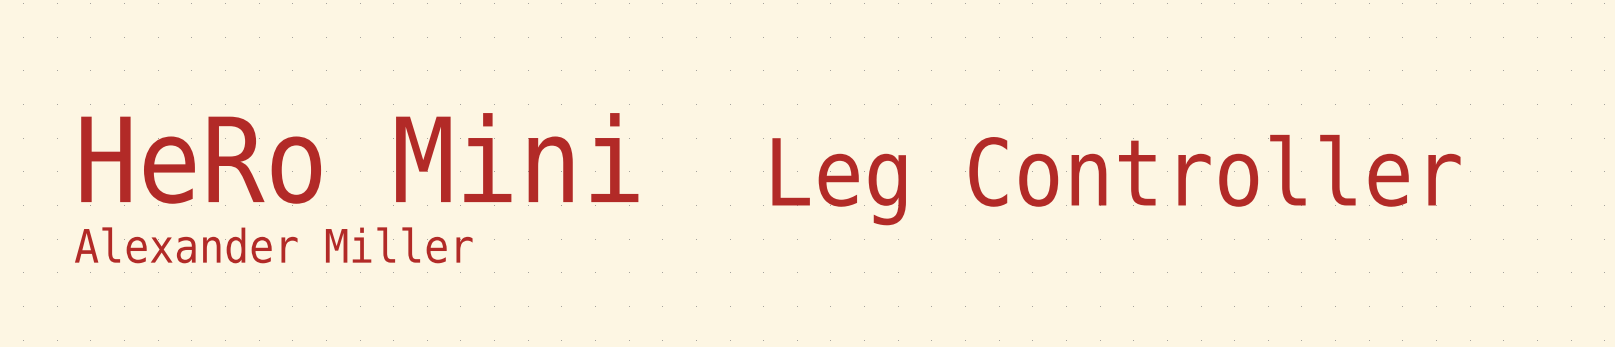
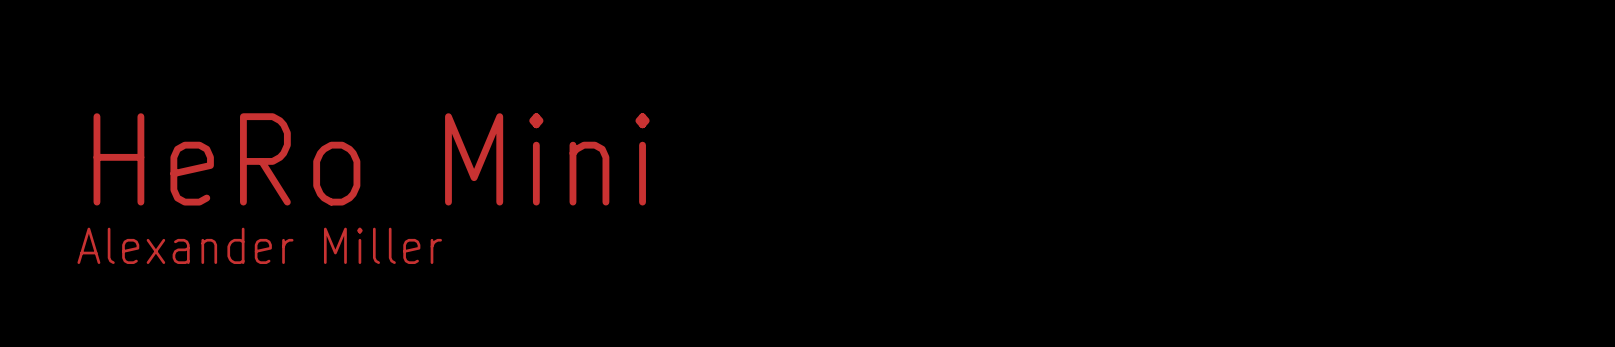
text: Leg Controller (1116, 180) -> none

